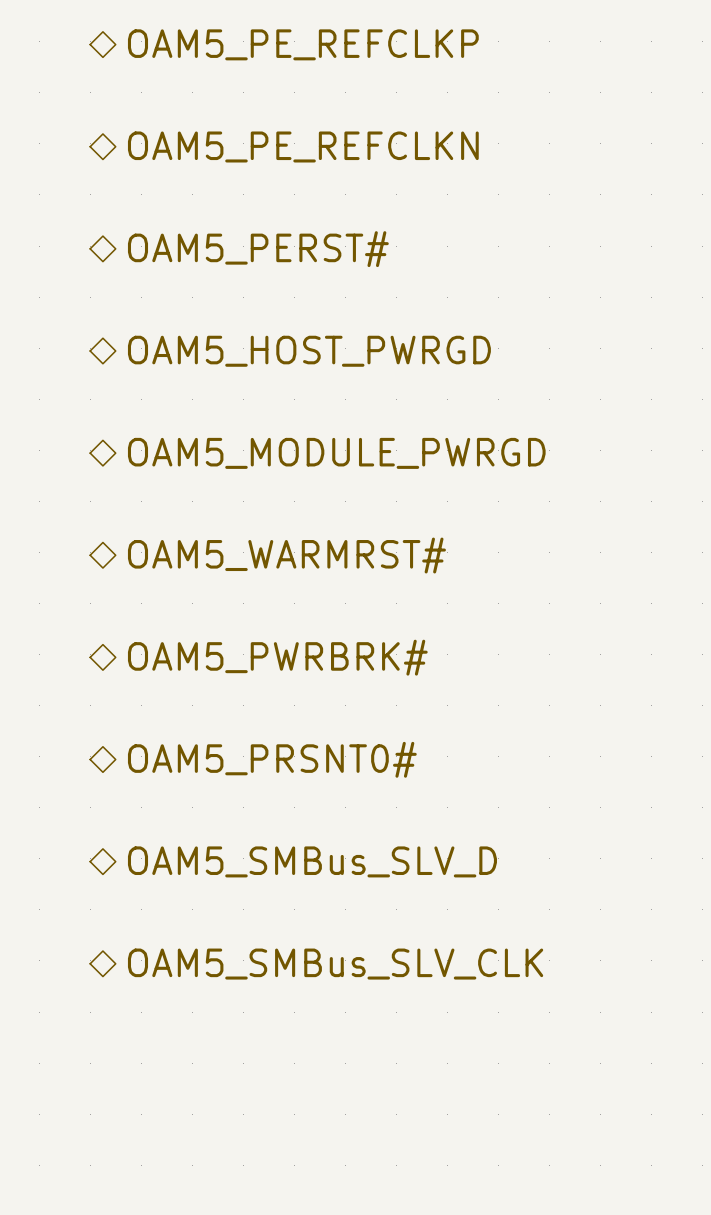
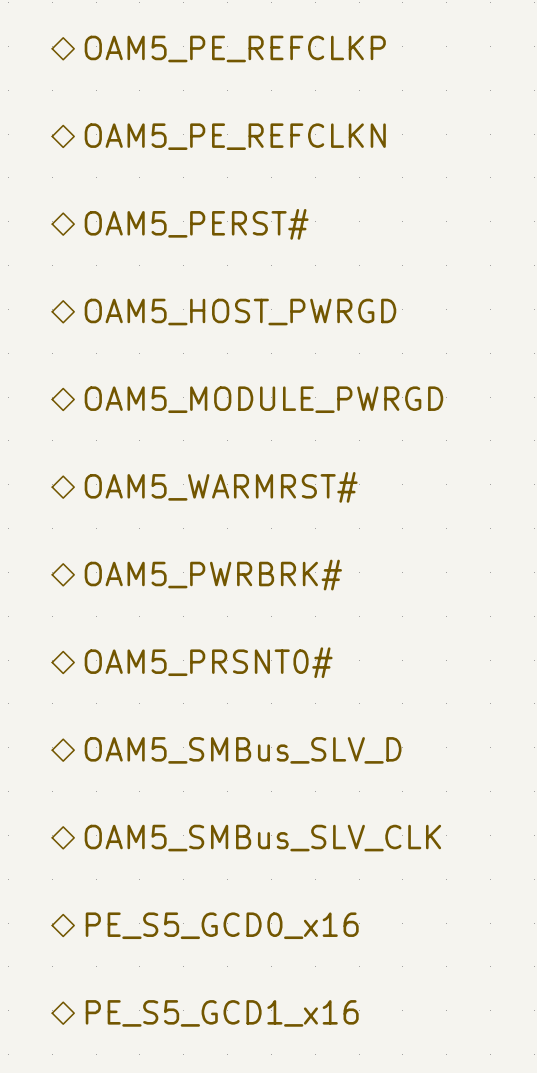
hierarchical label: none -> PE_S5_GCD0_x16 (222, 925)
hierarchical label: none -> PE_S5_GCD1_x16 (222, 1013)

